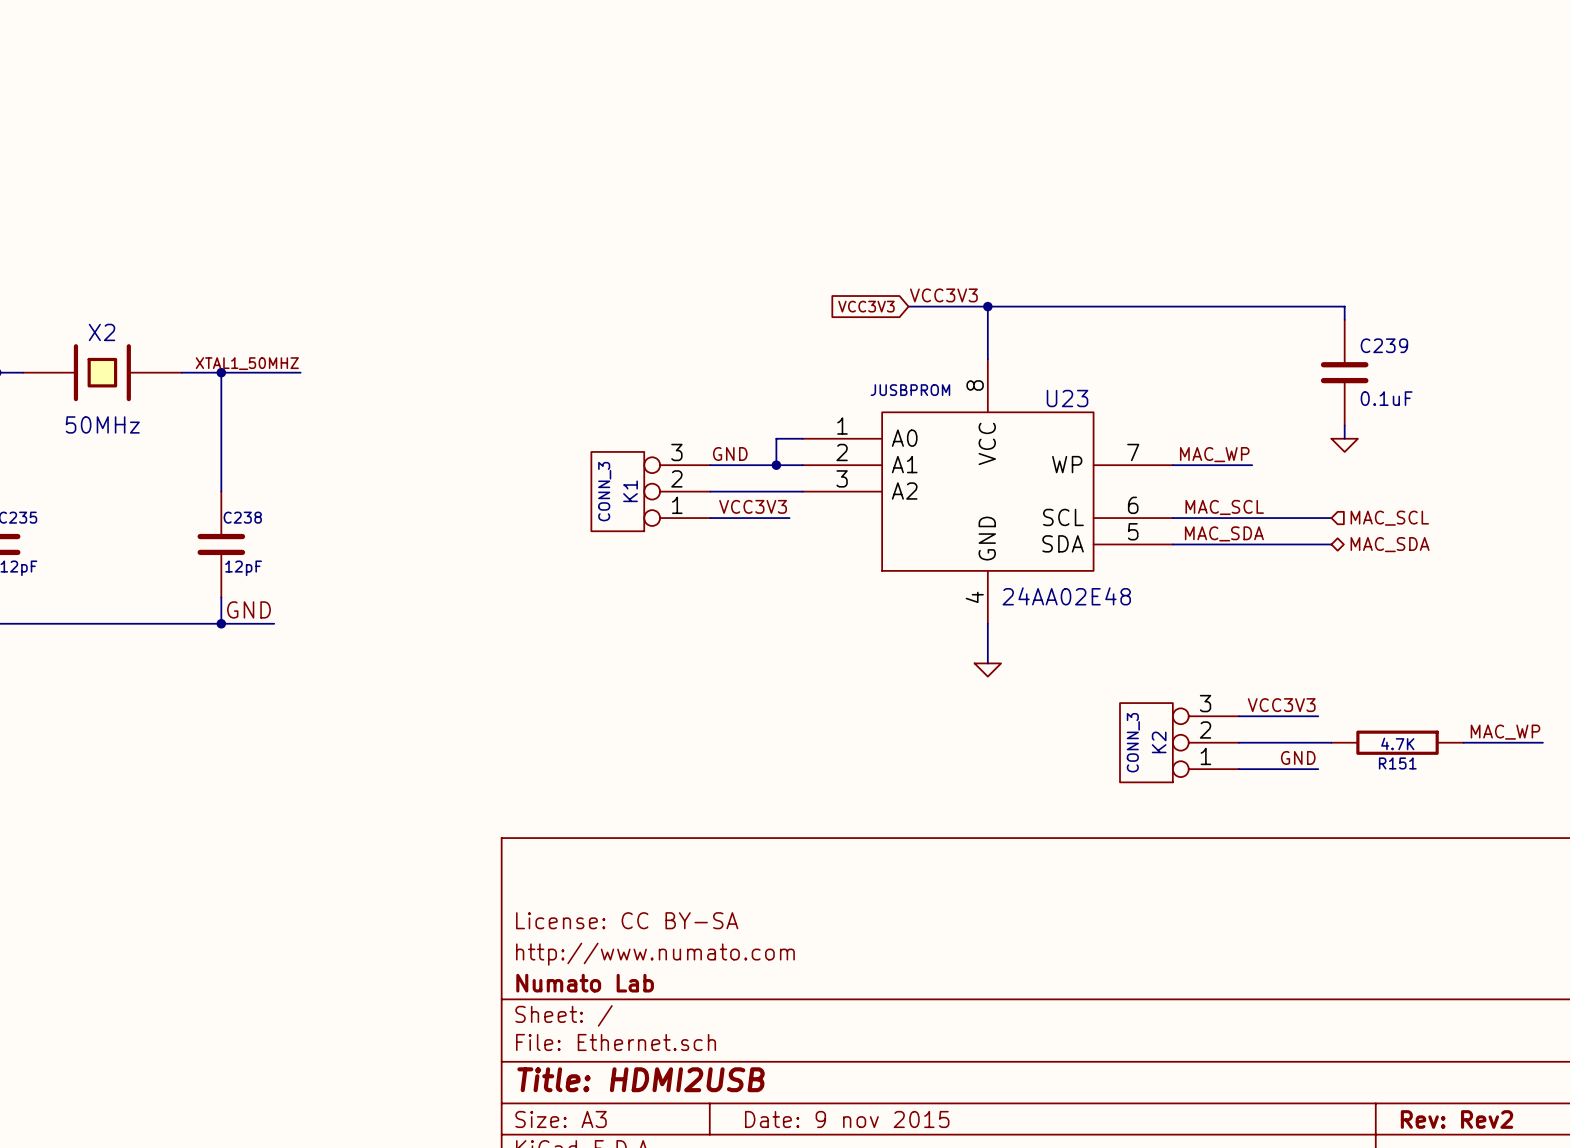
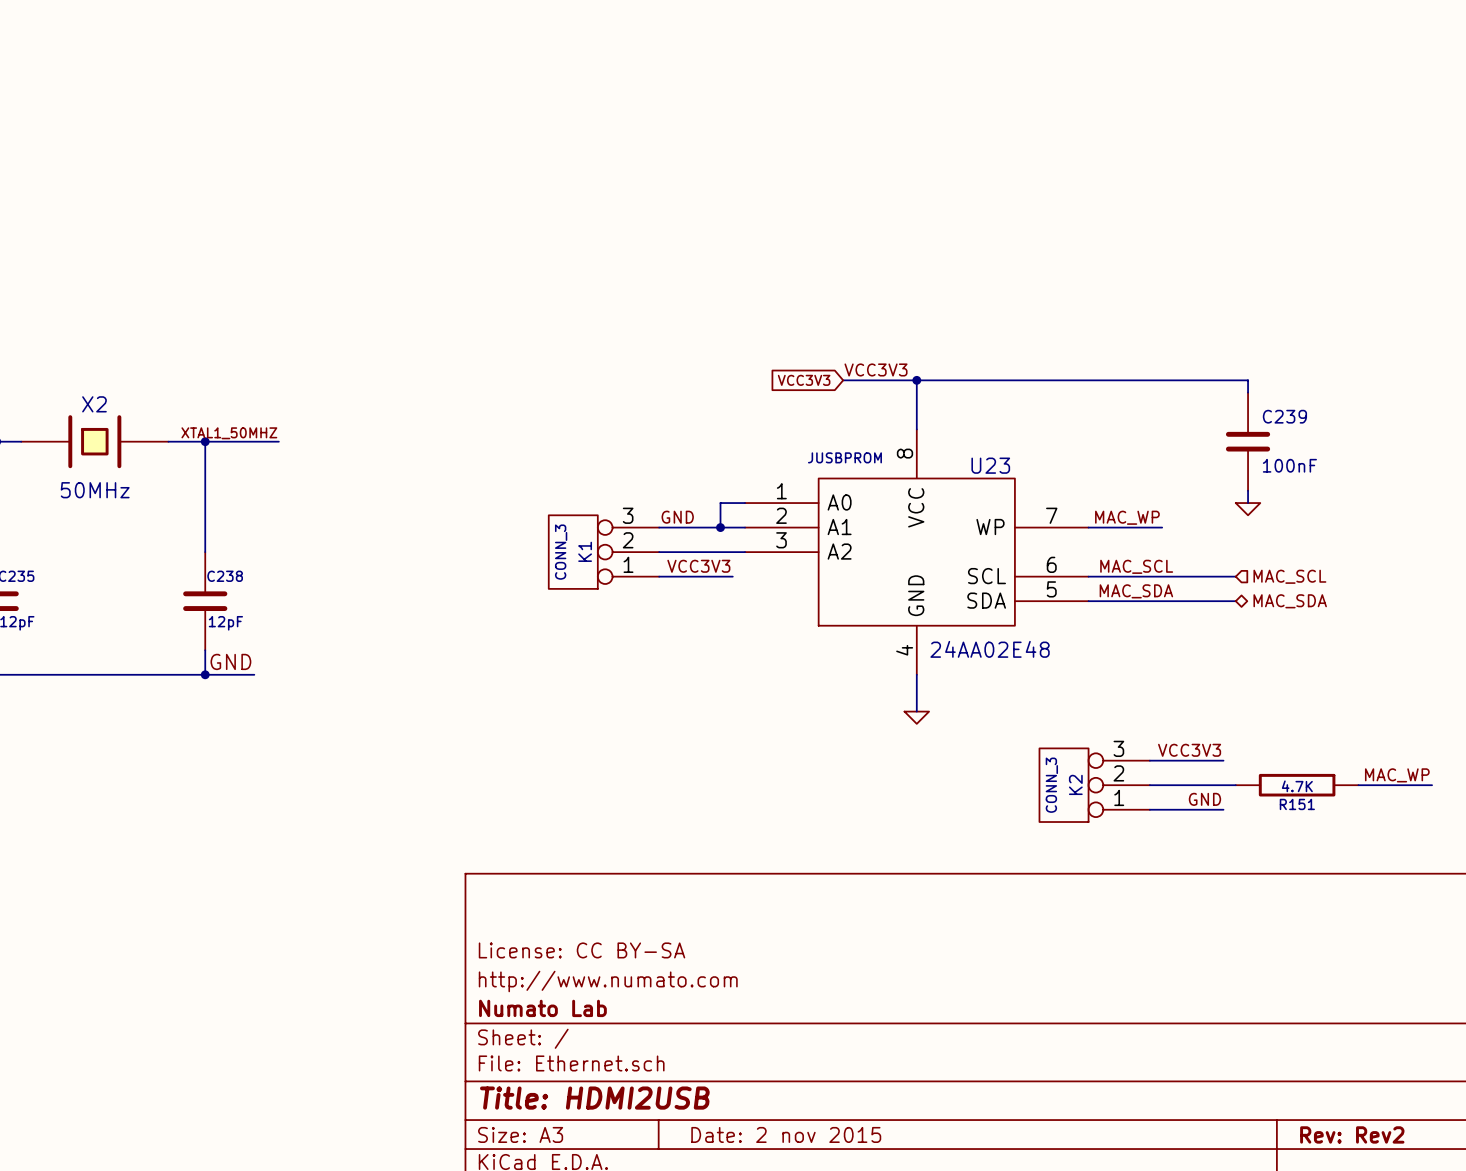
C239 value: 0.1uF (1386, 398) -> 100nF (1289, 465)
title block: Date: 9 nov 2015 (847, 1119) -> Date: 2 nov 2015 (786, 1134)

